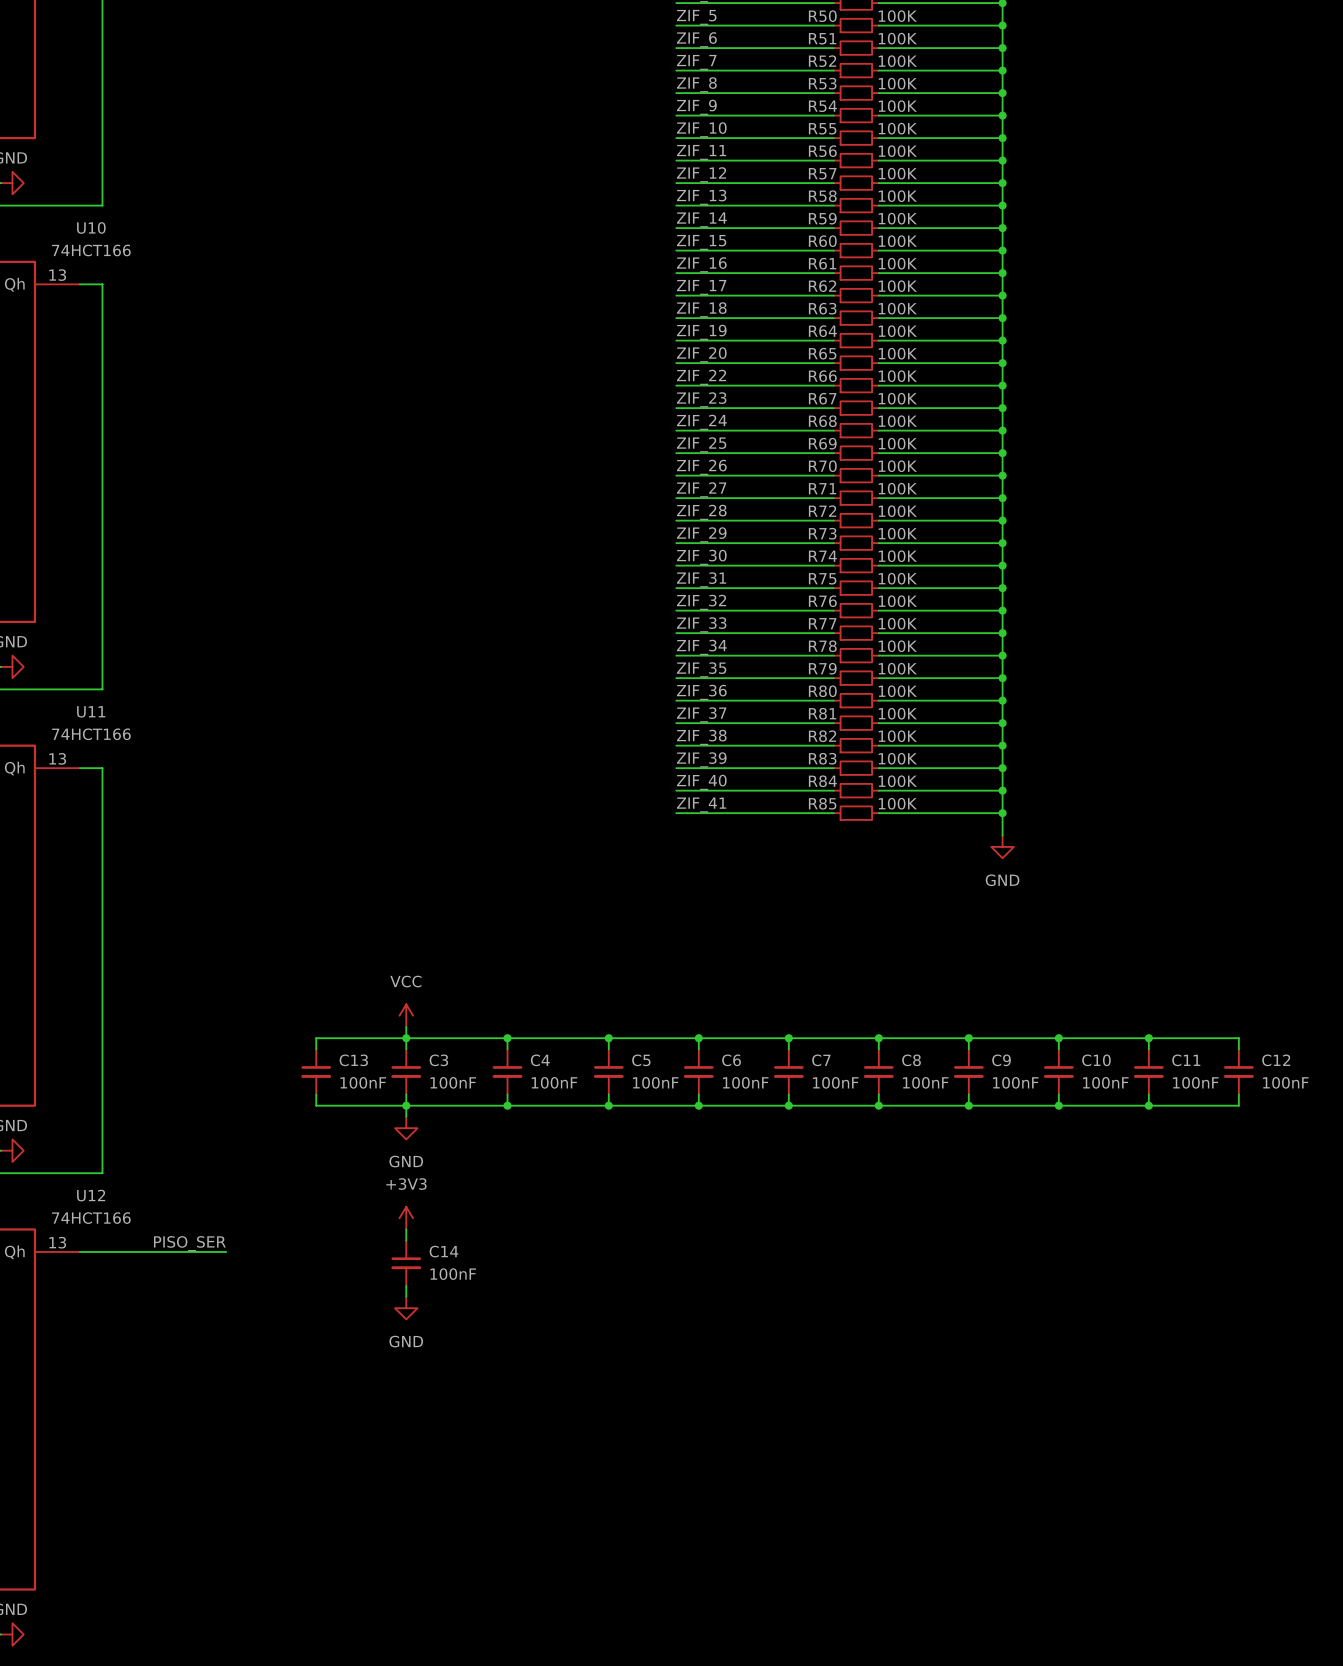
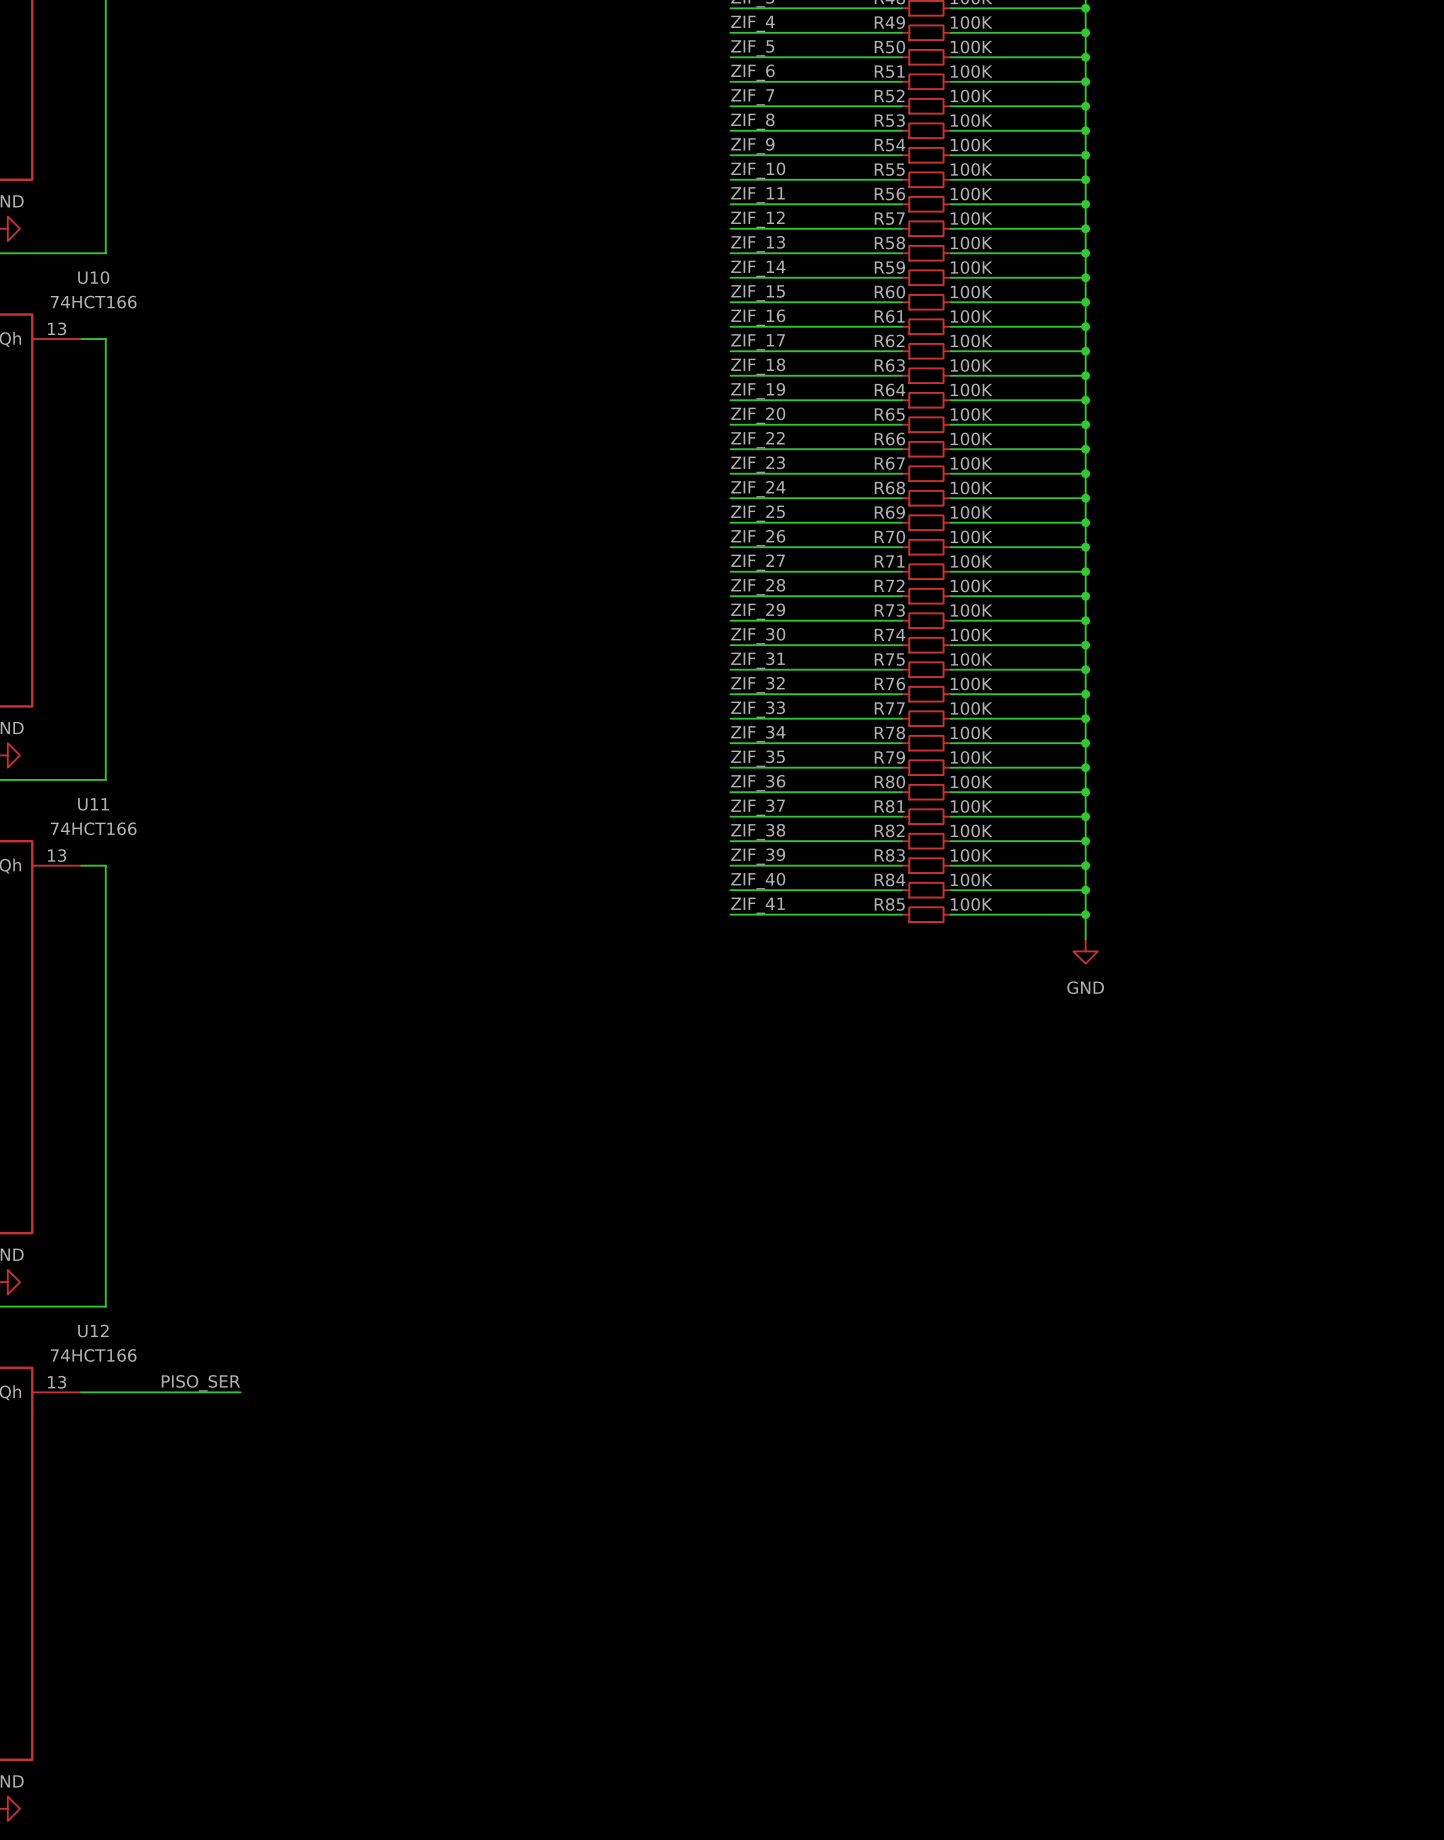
power symbol: VCC (406, 1015) -> none
wire: (406, 1026) (406, 1049) -> none
junction: (406, 1038) -> none
wire: (507, 1038) (507, 1049) -> none
junction: (507, 1038) -> none
wire: (608, 1038) (608, 1049) -> none
junction: (608, 1038) -> none
wire: (698, 1038) (698, 1049) -> none
junction: (698, 1038) -> none
wire: (788, 1038) (788, 1049) -> none
junction: (788, 1038) -> none
wire: (878, 1038) (878, 1049) -> none
junction: (878, 1038) -> none
wire: (968, 1038) (968, 1049) -> none
junction: (968, 1038) -> none
wire: (1058, 1038) (1058, 1049) -> none
junction: (1058, 1038) -> none
wire: (1148, 1038) (1148, 1049) -> none
junction: (1148, 1038) -> none
wire: (316, 1049) (316, 1038) (1238, 1038) (1238, 1049) -> none
C13: 100nF (316, 1071) -> none
C3: 100nF (406, 1071) -> none
C4: 100nF (507, 1071) -> none
C5: 100nF (608, 1071) -> none
C6: 100nF (698, 1071) -> none
C7: 100nF (788, 1071) -> none
C8: 100nF (878, 1071) -> none
C9: 100nF (968, 1071) -> none
C10: 100nF (1058, 1071) -> none
C11: 100nF (1148, 1071) -> none
C12: 100nF (1238, 1071) -> none
wire: (316, 1094) (316, 1105) (1238, 1105) (1238, 1094) -> none
wire: (406, 1094) (406, 1116) -> none
wire: (507, 1094) (507, 1105) -> none
wire: (608, 1094) (608, 1105) -> none
wire: (698, 1094) (698, 1105) -> none
wire: (788, 1094) (788, 1105) -> none
wire: (878, 1094) (878, 1105) -> none
wire: (968, 1094) (968, 1105) -> none
wire: (1058, 1094) (1058, 1105) -> none
wire: (1148, 1094) (1148, 1105) -> none
junction: (406, 1105) -> none
junction: (507, 1105) -> none
junction: (608, 1105) -> none
junction: (698, 1105) -> none
junction: (788, 1105) -> none
junction: (878, 1105) -> none
junction: (968, 1105) -> none
junction: (1058, 1105) -> none
junction: (1148, 1105) -> none
power symbol: GND (406, 1128) -> none
power symbol: +3V3 (406, 1218) -> none
wire: (406, 1229) (406, 1240) -> none
C14: 100nF (406, 1263) -> none
wire: (406, 1285) (406, 1296) -> none
power symbol: GND (406, 1308) -> none

